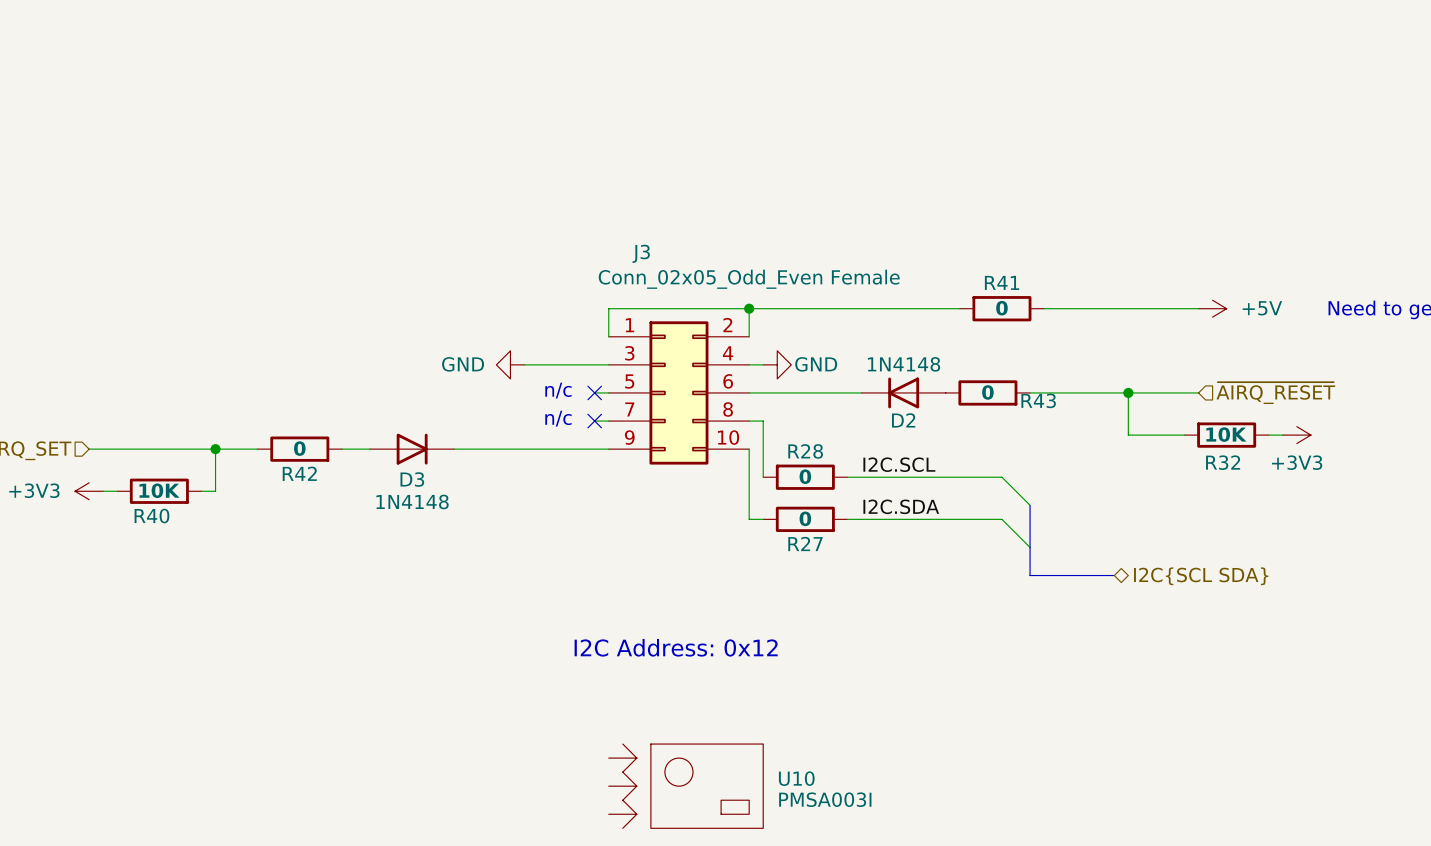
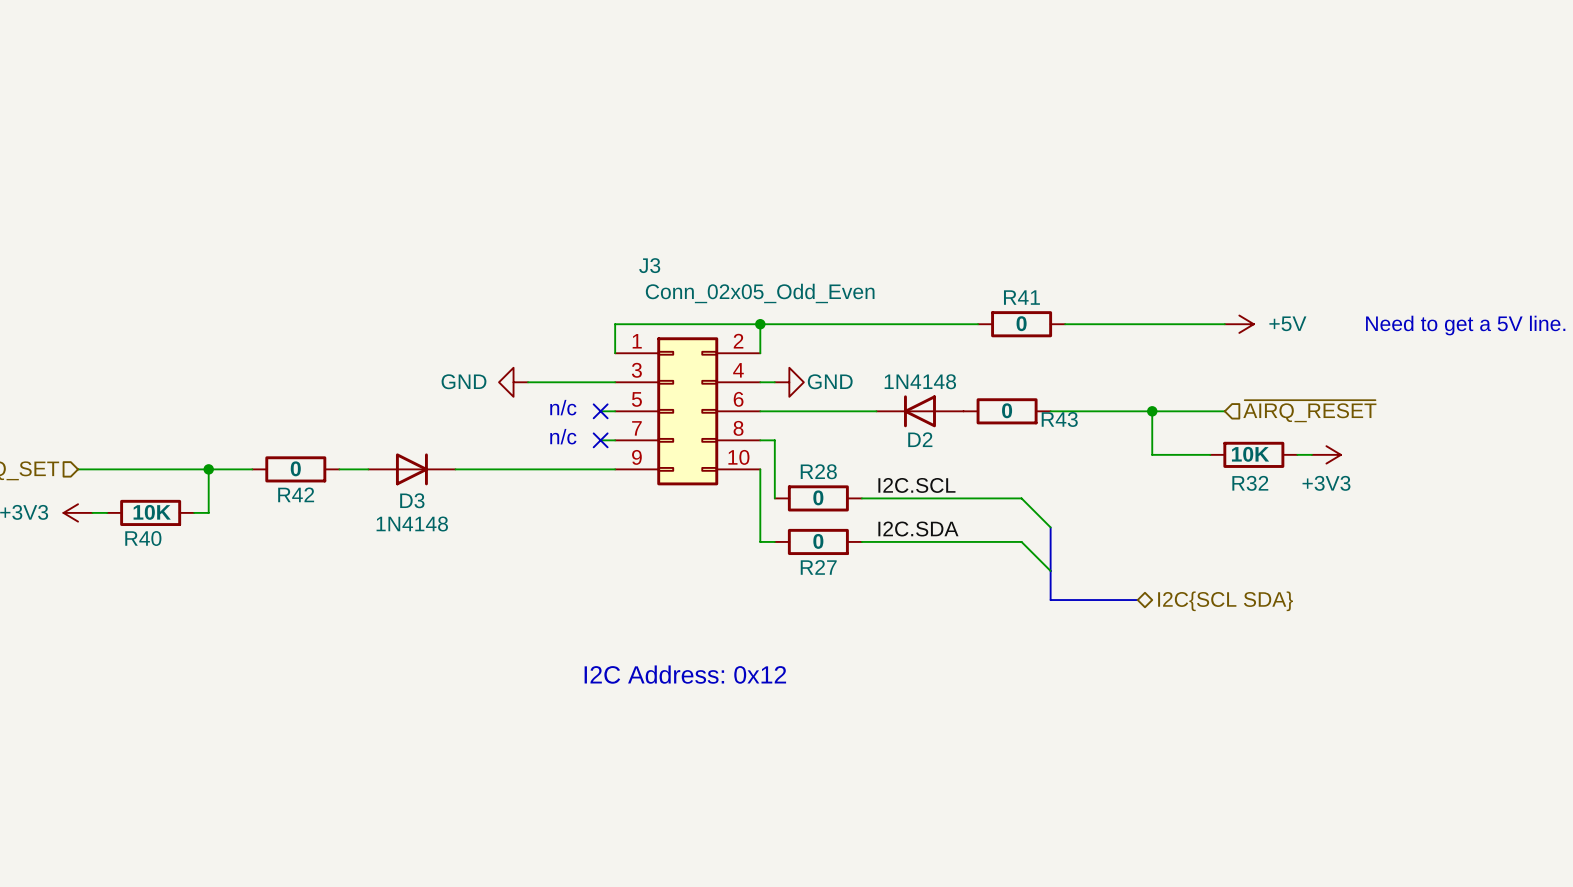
J3 value: Conn_02x05_Odd_Even Female (749, 279) -> Conn_02x05_Odd_Even (760, 293)
U10: PMSA003I (685, 786) -> none

